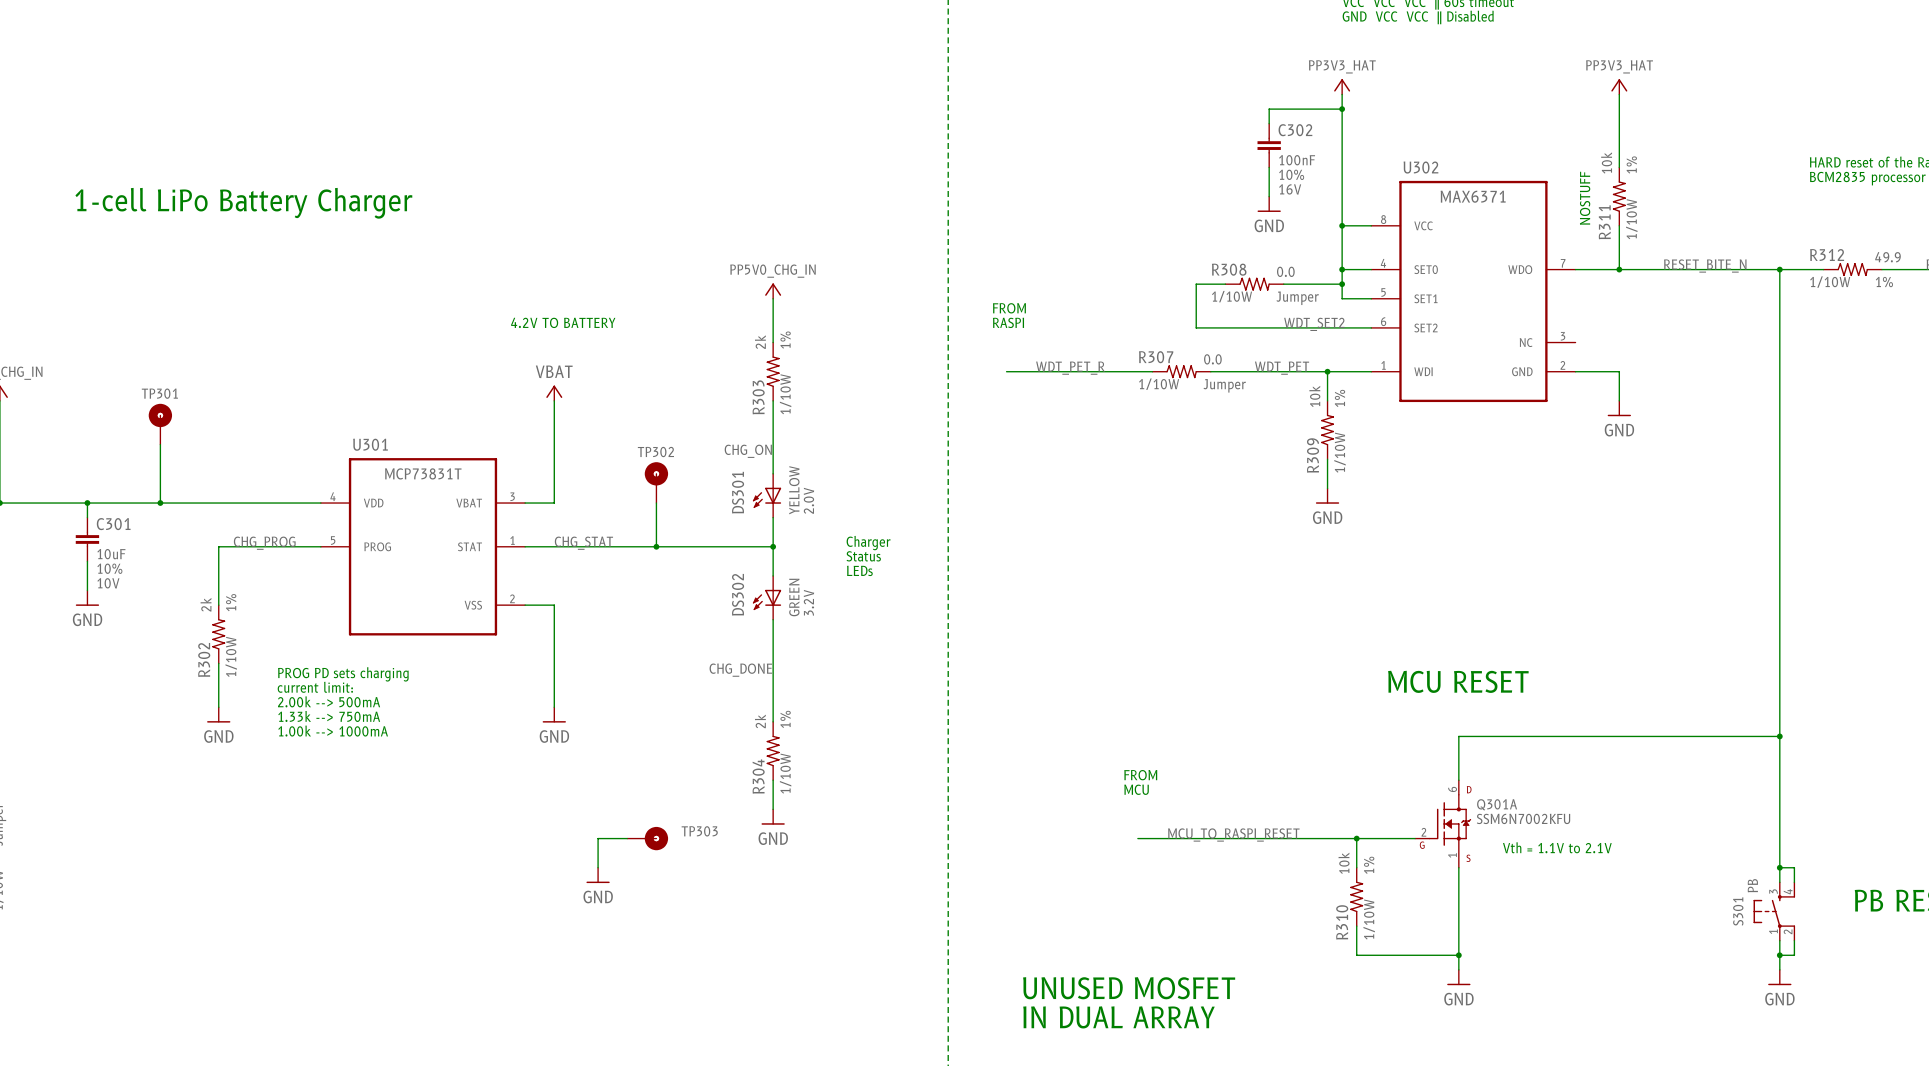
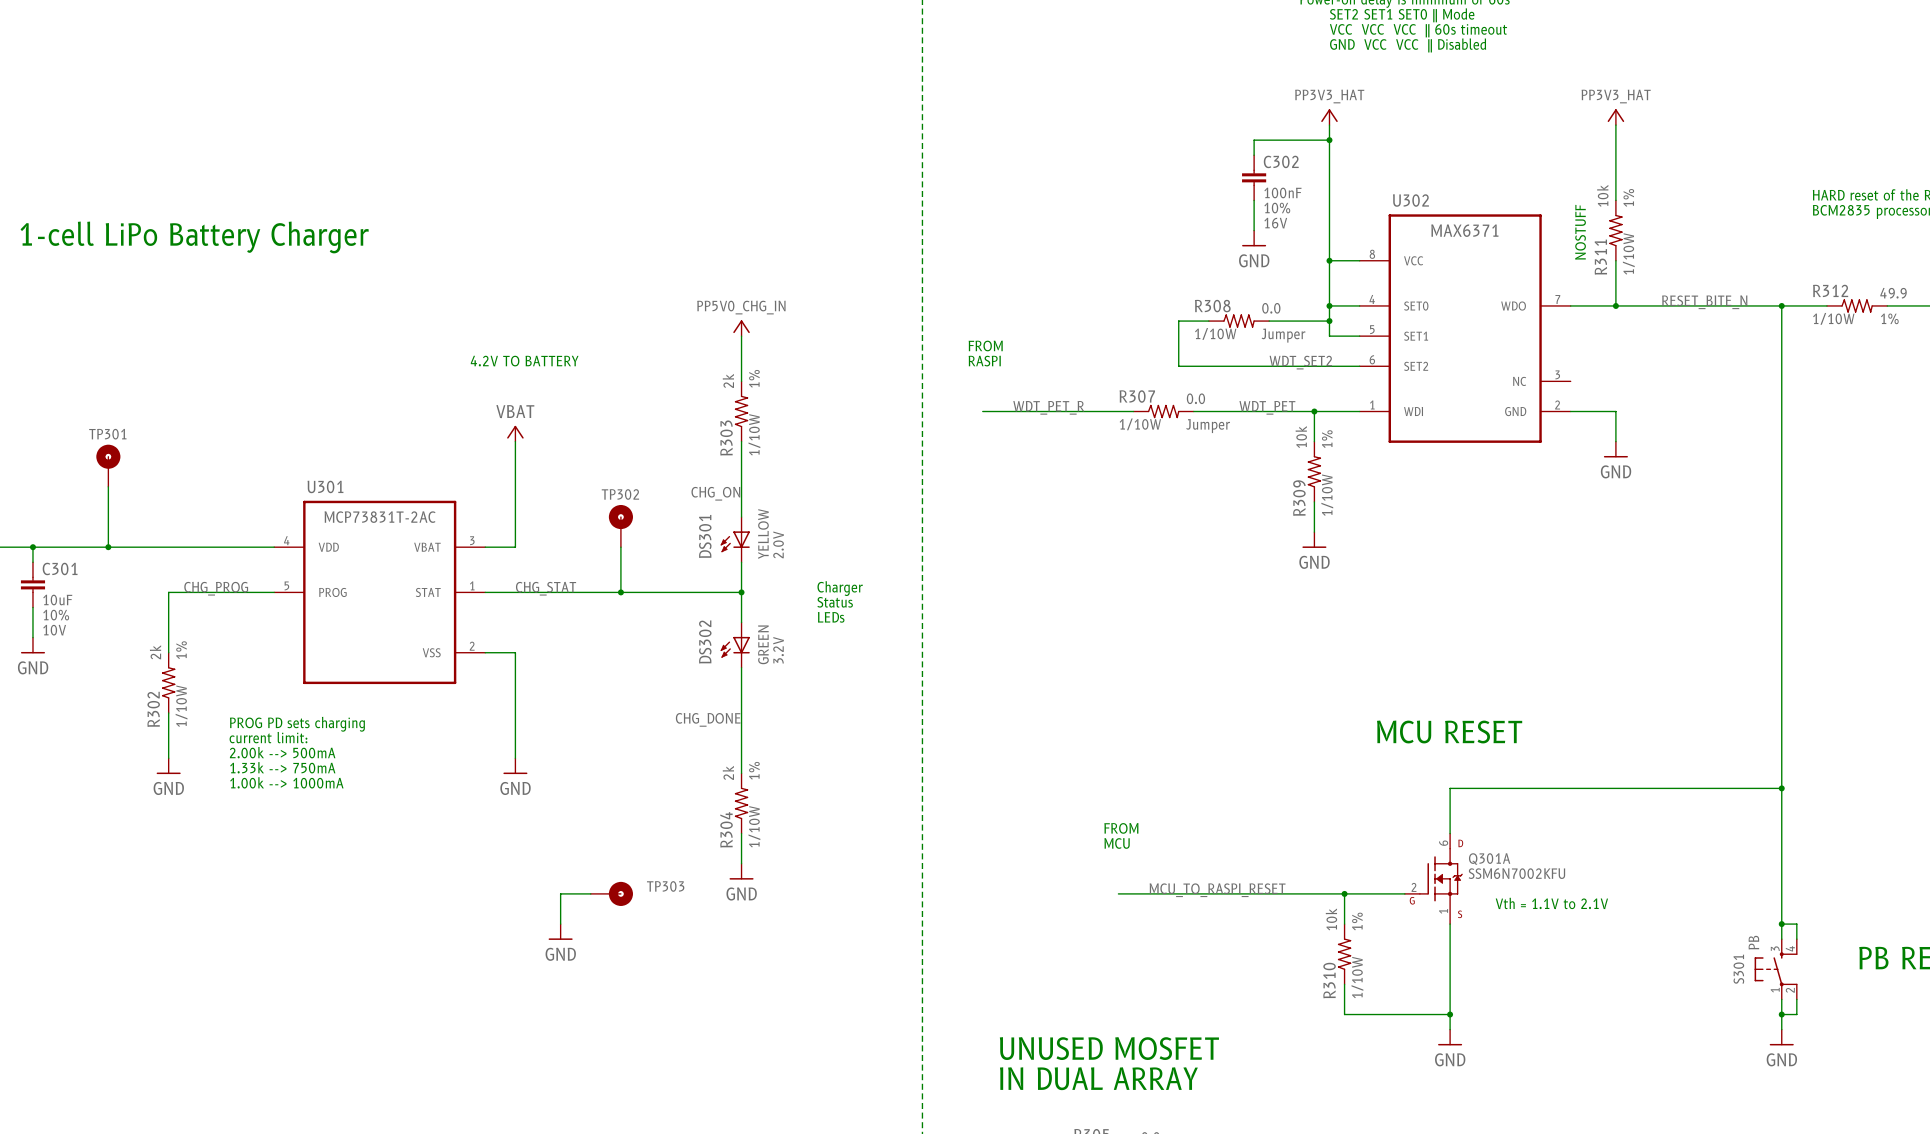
U301 value: MCP73831T (423, 473) -> MCP73831T-2AC (380, 517)

